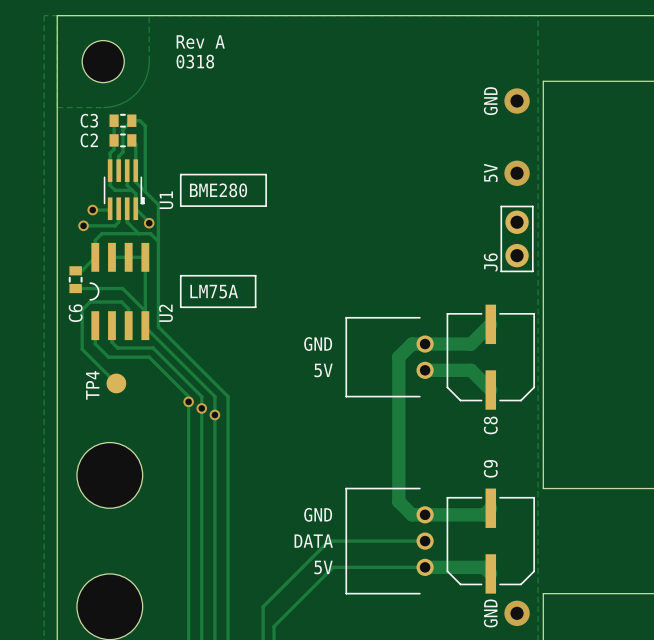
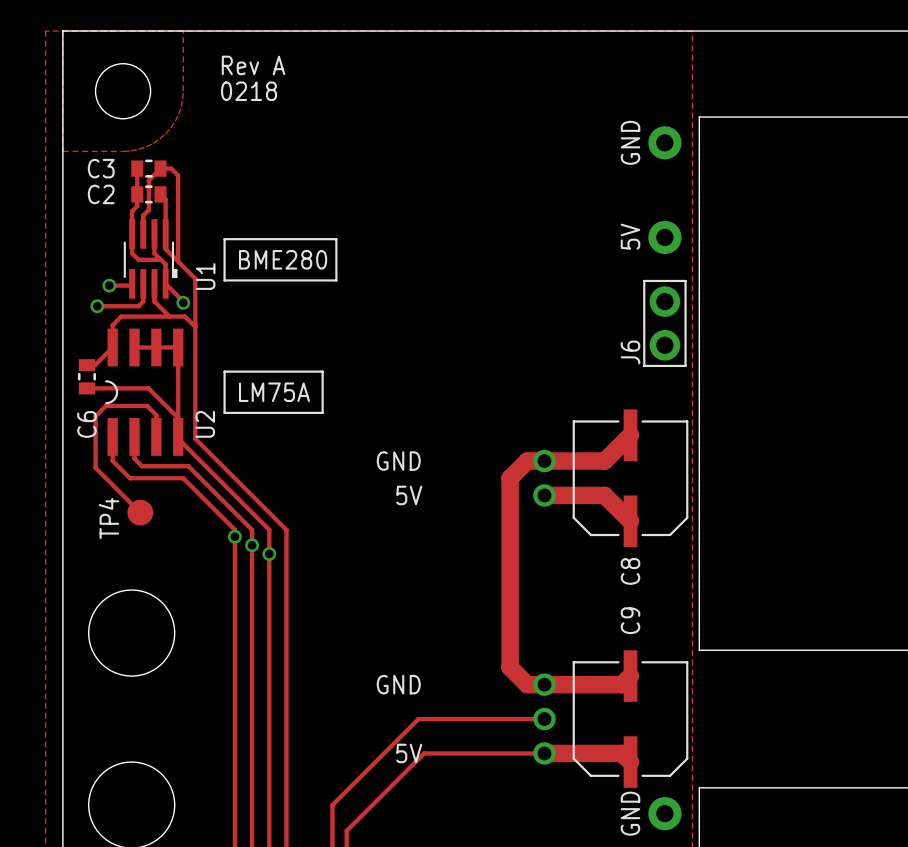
text: 0318 (195, 61) -> 0218 (249, 91)
line: (419, 317) (346, 317) (346, 396) (419, 396) -> none
line: (419, 488) (346, 488) (346, 593) (419, 593) -> none
text: DATA (313, 541) -> none

